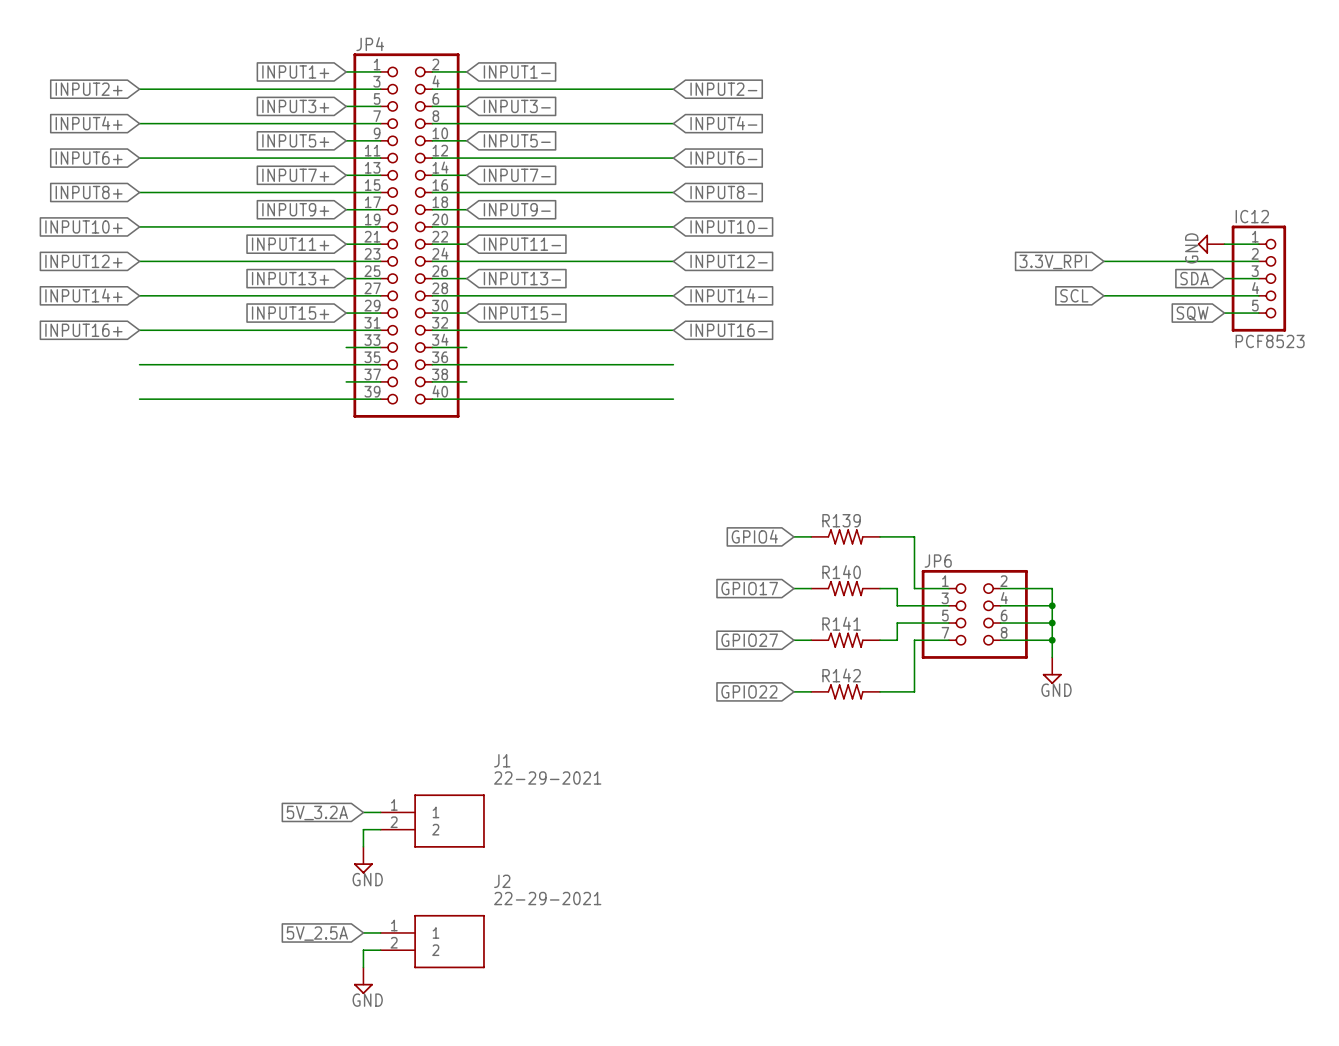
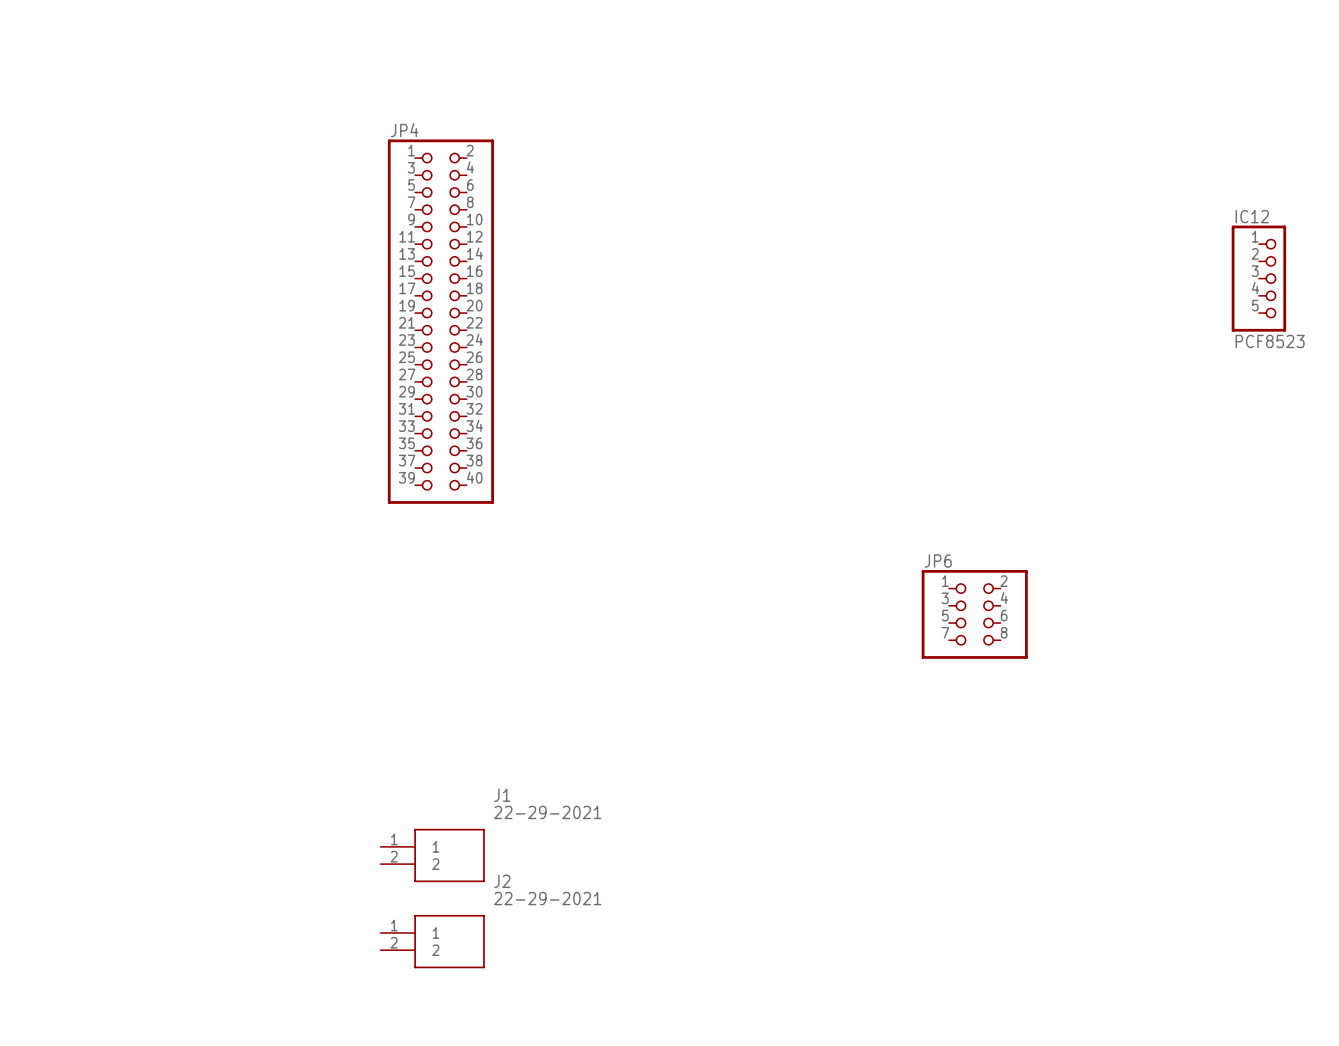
global label: INPUT1+ (295, 71) -> none
wire: (346, 71) (380, 71) -> none
wire: (432, 71) (466, 71) -> none
global label: INPUT1- (517, 71) -> none
global label: INPUT2+ (89, 89) -> none
wire: (139, 89) (380, 89) -> none
wire: (432, 89) (673, 89) -> none
global label: INPUT2- (723, 89) -> none
global label: INPUT3+ (295, 106) -> none
wire: (346, 106) (380, 106) -> none
wire: (432, 106) (466, 106) -> none
global label: INPUT3- (517, 106) -> none
global label: INPUT4+ (89, 123) -> none
wire: (139, 123) (380, 123) -> none
wire: (432, 123) (673, 123) -> none
global label: INPUT4- (723, 123) -> none
global label: INPUT5+ (295, 140) -> none
wire: (346, 140) (380, 140) -> none
global label: INPUT5- (517, 140) -> none
global label: INPUT6+ (89, 158) -> none
wire: (139, 158) (380, 158) -> none
wire: (432, 158) (673, 158) -> none
global label: INPUT6- (723, 158) -> none
global label: INPUT7+ (295, 175) -> none
wire: (346, 175) (380, 175) -> none
wire: (432, 175) (466, 175) -> none
global label: INPUT7- (517, 175) -> none
global label: INPUT8+ (89, 192) -> none
wire: (139, 192) (380, 192) -> none
wire: (432, 192) (673, 192) -> none
global label: INPUT8- (723, 192) -> none
global label: INPUT9+ (295, 209) -> none
wire: (346, 209) (380, 209) -> none
wire: (432, 209) (466, 209) -> none
global label: INPUT9- (517, 209) -> none
global label: INPUT10+ (83, 226) -> none
wire: (139, 226) (380, 226) -> none
wire: (432, 226) (673, 226) -> none
global label: INPUT10- (729, 226) -> none
JP4 position: (406, 235) -> (440, 321)
global label: INPUT11+ (290, 244) -> none
wire: (346, 244) (380, 244) -> none
wire: (432, 244) (466, 244) -> none
global label: INPUT11- (522, 244) -> none
power symbol: GND (1211, 244) -> none
wire: (1224, 244) (1258, 244) -> none
global label: INPUT12+ (83, 261) -> none
wire: (139, 261) (380, 261) -> none
wire: (432, 261) (673, 261) -> none
global label: INPUT12- (729, 261) -> none
global label: 3.3V_RPI (1053, 261) -> none
wire: (1103, 261) (1258, 261) -> none
global label: INPUT13+ (290, 278) -> none
wire: (346, 278) (380, 278) -> none
wire: (432, 278) (466, 278) -> none
global label: INPUT13- (522, 278) -> none
global label: SDA (1194, 278) -> none
wire: (1224, 278) (1258, 278) -> none
global label: INPUT14+ (83, 295) -> none
wire: (139, 295) (380, 295) -> none
wire: (432, 295) (673, 295) -> none
global label: INPUT14- (729, 295) -> none
global label: SCL (1074, 295) -> none
wire: (1103, 295) (1258, 295) -> none
global label: INPUT15+ (290, 313) -> none
wire: (346, 313) (380, 313) -> none
wire: (432, 313) (466, 313) -> none
global label: INPUT15- (522, 313) -> none
global label: SQW (1192, 313) -> none
wire: (1224, 313) (1258, 313) -> none
global label: INPUT16+ (83, 330) -> none
wire: (139, 330) (380, 330) -> none
wire: (432, 330) (673, 330) -> none
global label: INPUT16- (729, 330) -> none
wire: (346, 347) (380, 347) -> none
wire: (432, 347) (466, 347) -> none
wire: (139, 364) (380, 364) -> none
wire: (432, 364) (673, 364) -> none
wire: (346, 381) (380, 381) -> none
wire: (432, 381) (466, 381) -> none
wire: (139, 399) (380, 399) -> none
wire: (432, 399) (673, 399) -> none
global label: GPIO4 (754, 536) -> none
wire: (793, 536) (811, 536) -> none
R139: (845, 536) -> none
wire: (880, 536) (914, 536) (914, 588) (948, 588) -> none
global label: GPIO17 (749, 588) -> none
wire: (793, 588) (811, 588) -> none
R140: (845, 588) -> none
wire: (880, 588) (897, 588) (897, 605) (948, 605) -> none
wire: (1000, 588) (1052, 588) (1052, 657) -> none
wire: (1000, 605) (1052, 605) -> none
junction: (1052, 605) -> none
wire: (948, 623) (897, 623) (897, 640) (880, 640) -> none
wire: (1000, 623) (1052, 623) -> none
junction: (1052, 623) -> none
global label: GPIO27 (749, 640) -> none
wire: (793, 640) (811, 640) -> none
R141: (845, 640) -> none
wire: (948, 640) (914, 640) (914, 691) (880, 691) -> none
wire: (1000, 640) (1052, 640) -> none
junction: (1052, 640) -> none
power symbol: GND (1052, 670) -> none
global label: GPIO22 (749, 691) -> none
wire: (793, 691) (811, 691) -> none
R142: (845, 691) -> none
wire: (363, 812) (380, 812) -> none
global label: 5V_3.2A (317, 813) -> none
J1 position: (432, 821) -> (432, 855)
wire: (380, 829) (363, 829) (363, 846) -> none
power symbol: GND (363, 860) -> none
wire: (363, 932) (380, 932) -> none
global label: 5V_2.5A (317, 933) -> none
wire: (380, 950) (363, 950) (363, 967) -> none
power symbol: GND (363, 980) -> none

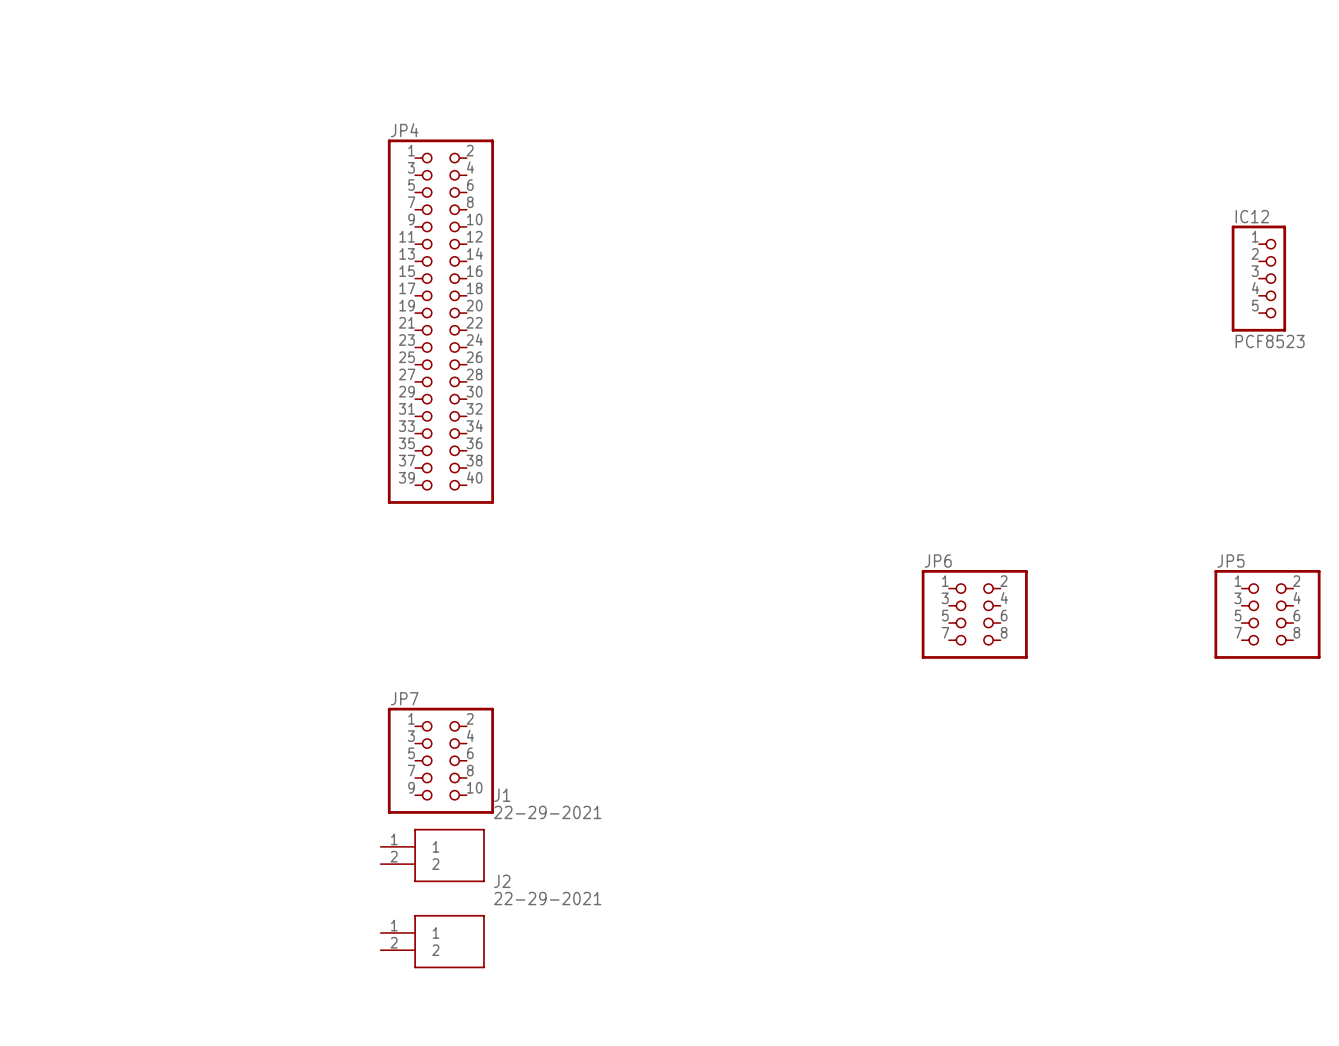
JP5: none -> (1267, 614)
JP7: none -> (440, 760)

